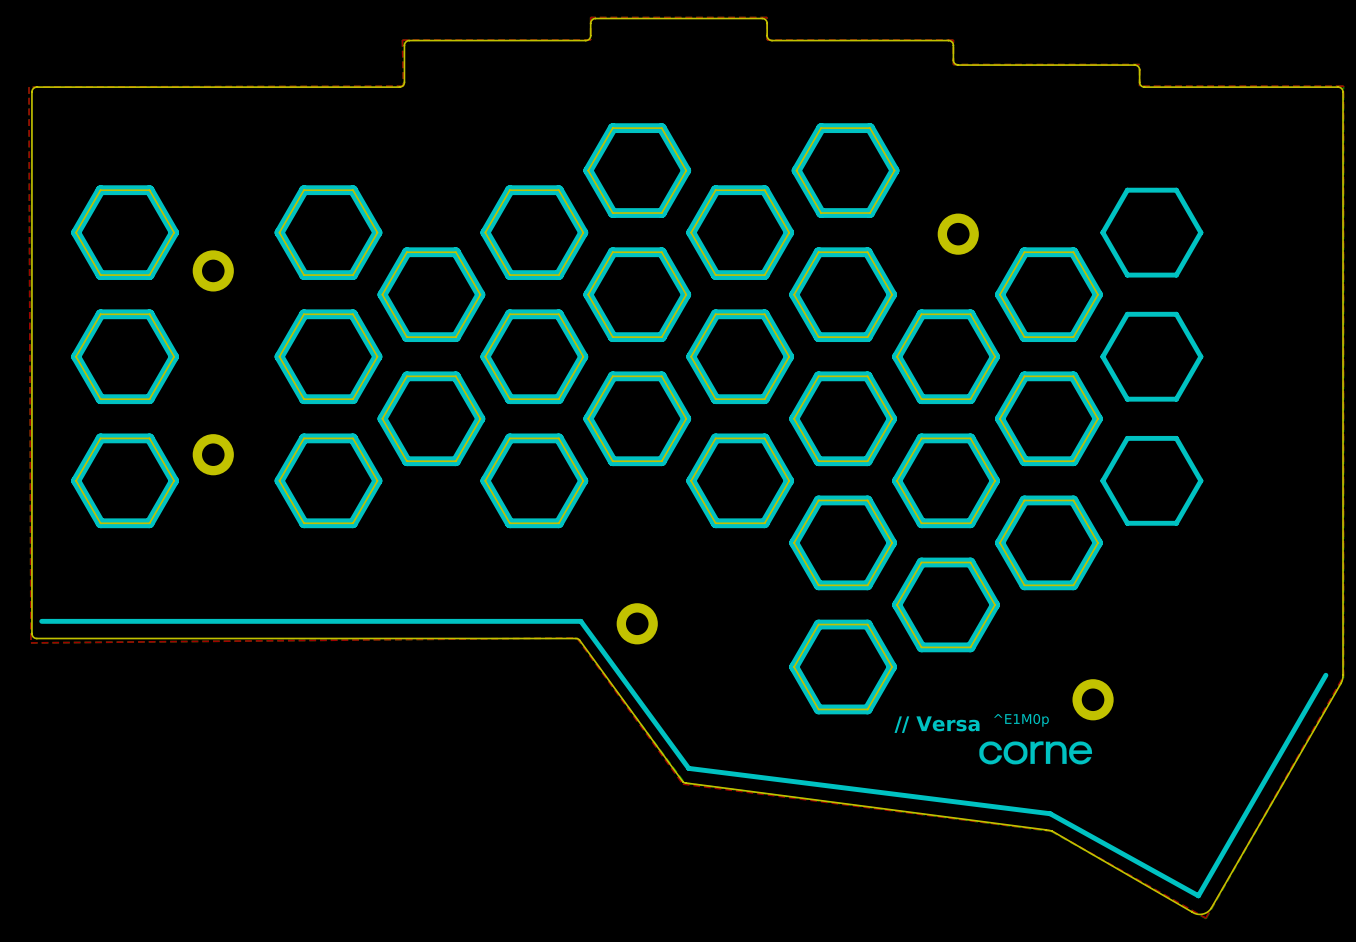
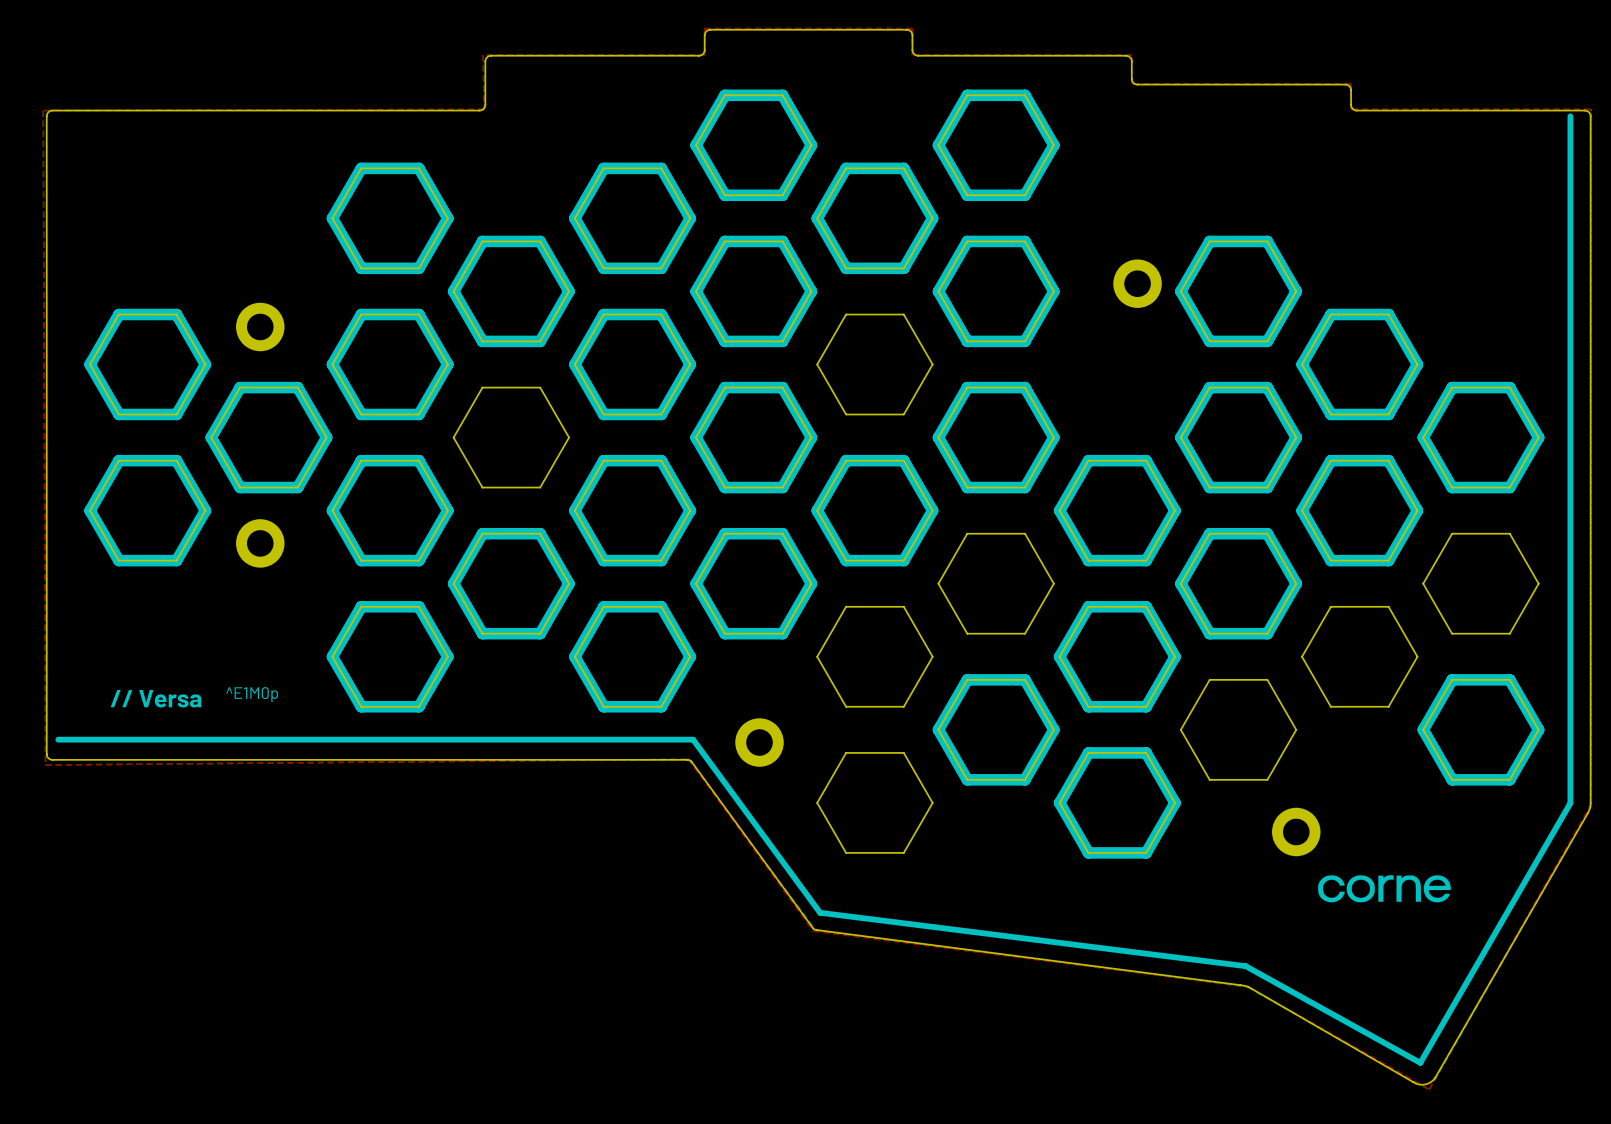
line: none -> (1570, 116) (1570, 803)
line: (612, 128) (661, 128) (686, 170) (661, 213) (612, 213) (588, 170) (612, 128) -> (724, 95) (782, 95) (811, 145) (782, 195) (724, 195) (696, 145) (724, 95)
board edge: (612, 128) (661, 128) (686, 170) (661, 213) (612, 213) (588, 170) (612, 128) -> (724, 95) (782, 95) (811, 145) (782, 195) (724, 195) (696, 145) (724, 95)
line: (821, 128) (796, 170) (821, 213) (870, 213) (894, 170) (870, 128) (821, 128) -> (967, 95) (938, 145) (967, 195) (1025, 195) (1053, 145) (1025, 95) (967, 95)
board edge: (821, 128) (870, 128) (894, 170) (870, 213) (821, 213) (796, 170) (821, 128) -> (967, 95) (1025, 95) (1053, 145) (1025, 195) (967, 195) (938, 145) (967, 95)
line: (100, 190) (149, 190) (174, 232) (149, 275) (100, 275) (76, 232) (100, 190) -> (118, 460) (176, 460) (205, 510) (176, 560) (118, 560) (90, 510) (118, 460)
board edge: (100, 190) (149, 190) (174, 232) (149, 275) (100, 275) (76, 232) (100, 190) -> (118, 460) (176, 460) (205, 510) (176, 560) (118, 560) (90, 510) (118, 460)
line: (303, 190) (279, 232) (303, 275) (352, 275) (377, 232) (352, 190) (303, 190) -> (361, 168) (332, 218) (361, 268) (418, 268) (447, 218) (418, 168) (361, 168)
board edge: (303, 190) (352, 190) (377, 232) (352, 275) (303, 275) (279, 232) (303, 190) -> (361, 168) (418, 168) (447, 218) (418, 268) (361, 268) (332, 218) (361, 168)
line: (509, 190) (558, 190) (583, 232) (558, 275) (509, 275) (485, 232) (509, 190) -> (603, 168) (661, 168) (690, 218) (661, 268) (603, 268) (574, 218) (603, 168)
board edge: (509, 190) (485, 232) (509, 275) (558, 275) (583, 232) (558, 190) (509, 190) -> (603, 168) (574, 218) (603, 268) (661, 268) (690, 218) (661, 168) (603, 168)
line: (715, 190) (764, 190) (789, 232) (764, 275) (715, 275) (691, 232) (715, 190) -> (846, 168) (903, 168) (932, 218) (903, 268) (846, 268) (817, 218) (846, 168)
board edge: (715, 190) (764, 190) (789, 232) (764, 275) (715, 275) (691, 232) (715, 190) -> (846, 168) (903, 168) (932, 218) (903, 268) (846, 268) (817, 218) (846, 168)
line: (1127, 190) (1102, 232) (1127, 275) (1176, 275) (1200, 232) (1176, 190) (1127, 190) -> (1452, 387) (1423, 437) (1452, 487) (1509, 487) (1538, 437) (1509, 387) (1452, 387)
line: (406, 252) (455, 252) (480, 294) (455, 337) (406, 337) (382, 294) (406, 252) -> (482, 241) (540, 241) (569, 291) (540, 341) (482, 341) (453, 291) (482, 241)
board edge: (406, 252) (455, 252) (480, 294) (455, 337) (406, 337) (382, 294) (406, 252) -> (482, 241) (540, 241) (569, 291) (540, 341) (482, 341) (453, 291) (482, 241)
line: (612, 252) (661, 252) (686, 294) (661, 337) (612, 337) (588, 294) (612, 252) -> (724, 241) (782, 241) (811, 291) (782, 341) (724, 341) (696, 291) (724, 241)
board edge: (612, 252) (661, 252) (686, 294) (661, 337) (612, 337) (588, 294) (612, 252) -> (724, 241) (782, 241) (811, 291) (782, 341) (724, 341) (696, 291) (724, 241)
line: (818, 252) (867, 252) (892, 294) (867, 337) (818, 337) (794, 294) (818, 252) -> (967, 241) (1025, 241) (1053, 291) (1025, 341) (967, 341) (938, 291) (967, 241)
board edge: (818, 252) (867, 252) (892, 294) (867, 337) (818, 337) (794, 294) (818, 252) -> (967, 241) (1025, 241) (1053, 291) (1025, 341) (967, 341) (938, 291) (967, 241)
line: (1024, 252) (1073, 252) (1097, 294) (1073, 337) (1024, 337) (999, 294) (1024, 252) -> (1209, 241) (1267, 241) (1296, 291) (1267, 341) (1209, 341) (1180, 291) (1209, 241)
board edge: (1024, 252) (1073, 252) (1097, 294) (1073, 337) (1024, 337) (999, 294) (1024, 252) -> (1209, 241) (1267, 241) (1296, 291) (1267, 341) (1209, 341) (1180, 291) (1209, 241)
line: (100, 314) (149, 314) (174, 356) (149, 399) (100, 399) (76, 356) (100, 314) -> (118, 314) (176, 314) (205, 364) (176, 414) (118, 414) (90, 364) (118, 314)
board edge: (100, 314) (149, 314) (174, 356) (149, 399) (100, 399) (76, 356) (100, 314) -> (118, 314) (176, 314) (205, 364) (176, 414) (118, 414) (90, 364) (118, 314)
line: (303, 314) (352, 314) (377, 356) (352, 399) (303, 399) (279, 356) (303, 314) -> (361, 314) (418, 314) (447, 364) (418, 414) (361, 414) (332, 364) (361, 314)
board edge: (303, 314) (352, 314) (377, 356) (352, 399) (303, 399) (279, 356) (303, 314) -> (361, 314) (418, 314) (447, 364) (418, 414) (361, 414) (332, 364) (361, 314)
line: (509, 314) (558, 314) (583, 356) (558, 399) (509, 399) (485, 356) (509, 314) -> (603, 314) (661, 314) (690, 364) (661, 414) (603, 414) (574, 364) (603, 314)
board edge: (509, 314) (558, 314) (583, 356) (558, 399) (509, 399) (485, 356) (509, 314) -> (603, 314) (661, 314) (690, 364) (661, 414) (603, 414) (574, 364) (603, 314)
line: (715, 314) (764, 314) (789, 356) (764, 399) (715, 399) (691, 356) (715, 314) -> none
board edge: (715, 314) (764, 314) (789, 356) (764, 399) (715, 399) (691, 356) (715, 314) -> (846, 314) (903, 314) (932, 364) (903, 414) (846, 414) (817, 364) (846, 314)
line: (921, 314) (970, 314) (995, 356) (970, 399) (921, 399) (897, 356) (921, 314) -> none
board edge: (921, 314) (970, 314) (995, 356) (970, 399) (921, 399) (897, 356) (921, 314) -> (1330, 314) (1388, 314) (1417, 364) (1388, 414) (1330, 414) (1302, 364) (1330, 314)
line: (1127, 314) (1102, 356) (1127, 399) (1176, 399) (1200, 356) (1176, 314) (1127, 314) -> (1330, 314) (1302, 364) (1330, 414) (1388, 414) (1417, 364) (1388, 314) (1330, 314)
line: none -> (240, 387) (211, 437) (240, 487) (297, 487) (326, 437) (297, 387) (240, 387)
board edge: none -> (240, 387) (297, 387) (326, 437) (297, 487) (240, 487) (211, 437) (240, 387)
board edge: none -> (1452, 387) (1423, 437) (1452, 487) (1509, 487) (1538, 437) (1509, 387) (1452, 387)
line: (406, 376) (455, 376) (480, 418) (455, 461) (406, 461) (382, 418) (406, 376) -> (482, 533) (540, 533) (569, 583) (540, 633) (482, 633) (453, 583) (482, 533)
board edge: (406, 376) (455, 376) (480, 418) (455, 461) (406, 461) (382, 418) (406, 376) -> (482, 387) (540, 387) (569, 437) (540, 487) (482, 487) (453, 437) (482, 387)
line: (612, 376) (661, 376) (686, 418) (661, 461) (612, 461) (588, 418) (612, 376) -> (724, 387) (782, 387) (811, 437) (782, 487) (724, 487) (696, 437) (724, 387)
board edge: (612, 376) (661, 376) (686, 418) (661, 461) (612, 461) (588, 418) (612, 376) -> (724, 387) (782, 387) (811, 437) (782, 487) (724, 487) (696, 437) (724, 387)
line: (818, 376) (794, 418) (818, 461) (867, 461) (892, 418) (867, 376) (818, 376) -> (967, 387) (938, 437) (967, 487) (1025, 487) (1053, 437) (1025, 387) (967, 387)
board edge: (818, 376) (794, 418) (818, 461) (867, 461) (892, 418) (867, 376) (818, 376) -> (967, 387) (938, 437) (967, 487) (1025, 487) (1053, 437) (1025, 387) (967, 387)
line: (1024, 376) (1073, 376) (1097, 418) (1073, 461) (1024, 461) (999, 418) (1024, 376) -> (1209, 387) (1267, 387) (1296, 437) (1267, 487) (1209, 487) (1180, 437) (1209, 387)
board edge: (1024, 376) (1073, 376) (1097, 418) (1073, 461) (1024, 461) (999, 418) (1024, 376) -> (1209, 387) (1267, 387) (1296, 437) (1267, 487) (1209, 487) (1180, 437) (1209, 387)
board edge: none -> (1330, 460) (1388, 460) (1417, 510) (1388, 560) (1330, 560) (1302, 510) (1330, 460)
line: (100, 438) (149, 438) (174, 480) (149, 523) (100, 523) (76, 480) (100, 438) -> (361, 606) (418, 606) (447, 656) (418, 706) (361, 706) (332, 656) (361, 606)
board edge: (100, 438) (149, 438) (174, 480) (149, 523) (100, 523) (76, 480) (100, 438) -> (361, 606) (418, 606) (447, 656) (418, 706) (361, 706) (332, 656) (361, 606)
line: (303, 438) (279, 480) (303, 523) (352, 523) (377, 480) (352, 438) (303, 438) -> (361, 460) (332, 510) (361, 560) (418, 560) (447, 510) (418, 460) (361, 460)
board edge: (303, 438) (352, 438) (377, 480) (352, 523) (303, 523) (279, 480) (303, 438) -> (361, 460) (418, 460) (447, 510) (418, 560) (361, 560) (332, 510) (361, 460)
line: (509, 438) (558, 438) (583, 480) (558, 523) (509, 523) (485, 480) (509, 438) -> (603, 460) (661, 460) (690, 510) (661, 560) (603, 560) (574, 510) (603, 460)
board edge: (509, 438) (558, 438) (583, 480) (558, 523) (509, 523) (485, 480) (509, 438) -> (603, 460) (661, 460) (690, 510) (661, 560) (603, 560) (574, 510) (603, 460)
line: (715, 438) (764, 438) (789, 480) (764, 523) (715, 523) (691, 480) (715, 438) -> (846, 460) (903, 460) (932, 510) (903, 560) (846, 560) (817, 510) (846, 460)
board edge: (715, 438) (764, 438) (789, 480) (764, 523) (715, 523) (691, 480) (715, 438) -> (846, 460) (903, 460) (932, 510) (903, 560) (846, 560) (817, 510) (846, 460)
line: (921, 438) (970, 438) (995, 480) (970, 523) (921, 523) (897, 480) (921, 438) -> (1088, 460) (1146, 460) (1175, 510) (1146, 560) (1088, 560) (1059, 510) (1088, 460)
board edge: (921, 438) (970, 438) (995, 480) (970, 523) (921, 523) (897, 480) (921, 438) -> (1088, 460) (1146, 460) (1175, 510) (1146, 560) (1088, 560) (1059, 510) (1088, 460)
line: (1127, 438) (1176, 438) (1200, 480) (1176, 523) (1127, 523) (1102, 480) (1127, 438) -> (1330, 460) (1388, 460) (1417, 510) (1388, 560) (1330, 560) (1302, 510) (1330, 460)
board edge: none -> (482, 533) (540, 533) (569, 583) (540, 633) (482, 633) (453, 583) (482, 533)
board edge: none -> (724, 533) (782, 533) (811, 583) (782, 633) (724, 633) (696, 583) (724, 533)
board edge: none -> (1452, 533) (1509, 533) (1538, 583) (1509, 633) (1452, 633) (1423, 583) (1452, 533)
line: (818, 500) (867, 500) (892, 542) (867, 585) (818, 585) (794, 542) (818, 500) -> (724, 533) (782, 533) (811, 583) (782, 633) (724, 633) (696, 583) (724, 533)
board edge: (818, 500) (867, 500) (892, 542) (867, 585) (818, 585) (794, 542) (818, 500) -> (967, 533) (1025, 533) (1053, 583) (1025, 633) (967, 633) (938, 583) (967, 533)
line: (1024, 500) (1073, 500) (1097, 542) (1073, 585) (1024, 585) (999, 542) (1024, 500) -> (1209, 533) (1267, 533) (1296, 583) (1267, 633) (1209, 633) (1180, 583) (1209, 533)
board edge: (1024, 500) (1073, 500) (1097, 542) (1073, 585) (1024, 585) (999, 542) (1024, 500) -> (1209, 533) (1267, 533) (1296, 583) (1267, 633) (1209, 633) (1180, 583) (1209, 533)
line: none -> (603, 606) (661, 606) (690, 656) (661, 706) (603, 706) (574, 656) (603, 606)
board edge: none -> (603, 606) (661, 606) (690, 656) (661, 706) (603, 706) (574, 656) (603, 606)
board edge: none -> (846, 606) (903, 606) (932, 656) (903, 706) (846, 706) (817, 656) (846, 606)
board edge: none -> (1330, 606) (1388, 606) (1417, 656) (1388, 706) (1330, 706) (1302, 656) (1330, 606)
line: (921, 562) (897, 604) (921, 647) (970, 647) (995, 604) (970, 562) (921, 562) -> (1088, 606) (1059, 656) (1088, 706) (1146, 706) (1175, 656) (1146, 606) (1088, 606)
board edge: (921, 562) (970, 562) (995, 604) (970, 647) (921, 647) (897, 604) (921, 562) -> (1088, 606) (1146, 606) (1175, 656) (1146, 706) (1088, 706) (1059, 656) (1088, 606)
board edge: none -> (1209, 679) (1267, 679) (1296, 729) (1267, 779) (1209, 779) (1180, 729) (1209, 679)
line: none -> (1452, 679) (1423, 729) (1452, 779) (1509, 779) (1538, 729) (1509, 679) (1452, 679)
board edge: none -> (1452, 679) (1423, 729) (1452, 779) (1509, 779) (1538, 729) (1509, 679) (1452, 679)
text: none -> ^E1M0p (252, 694)
text: none -> // Versa (155, 698)
line: (818, 624) (867, 624) (892, 666) (867, 709) (818, 709) (794, 666) (818, 624) -> (967, 679) (1025, 679) (1053, 729) (1025, 779) (967, 779) (938, 729) (967, 679)
board edge: (818, 624) (867, 624) (892, 666) (867, 709) (818, 709) (794, 666) (818, 624) -> (967, 679) (1025, 679) (1053, 729) (1025, 779) (967, 779) (938, 729) (967, 679)
board edge: none -> (846, 752) (903, 752) (932, 802) (903, 852) (846, 852) (817, 802) (846, 752)
line: none -> (1088, 752) (1059, 802) (1088, 852) (1146, 852) (1175, 802) (1146, 752) (1088, 752)
board edge: none -> (1088, 752) (1146, 752) (1175, 802) (1146, 852) (1088, 852) (1059, 802) (1088, 752)
text: ^E1M0p (1021, 720) -> none
text: // Versa (937, 724) -> none
drawing position: (1035, 752) -> (1384, 888)

